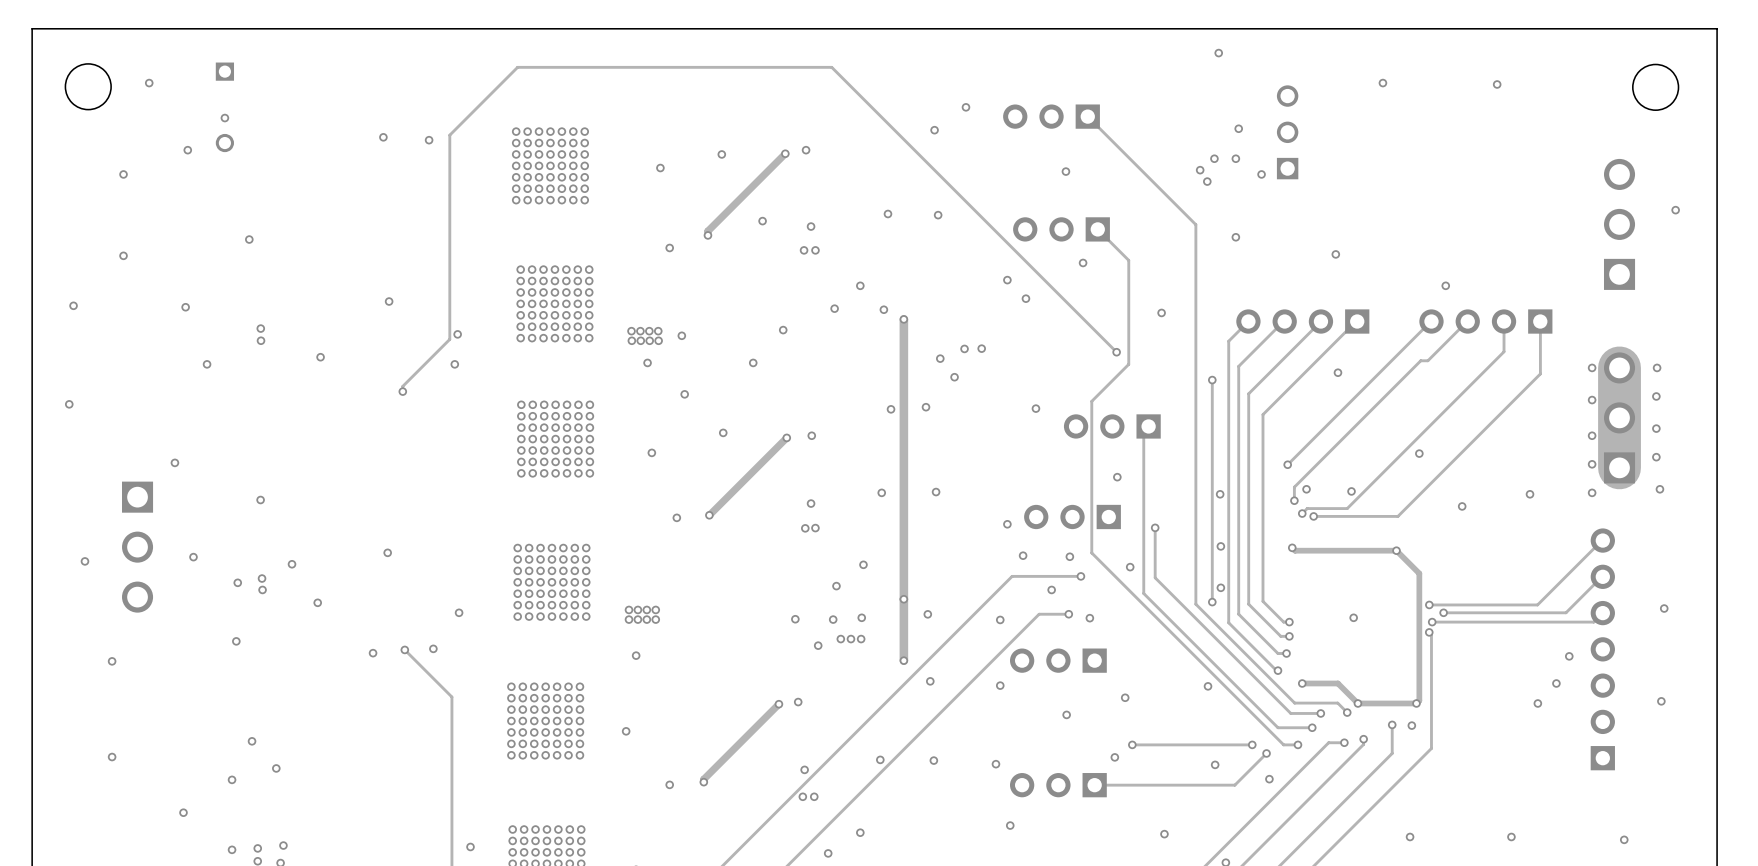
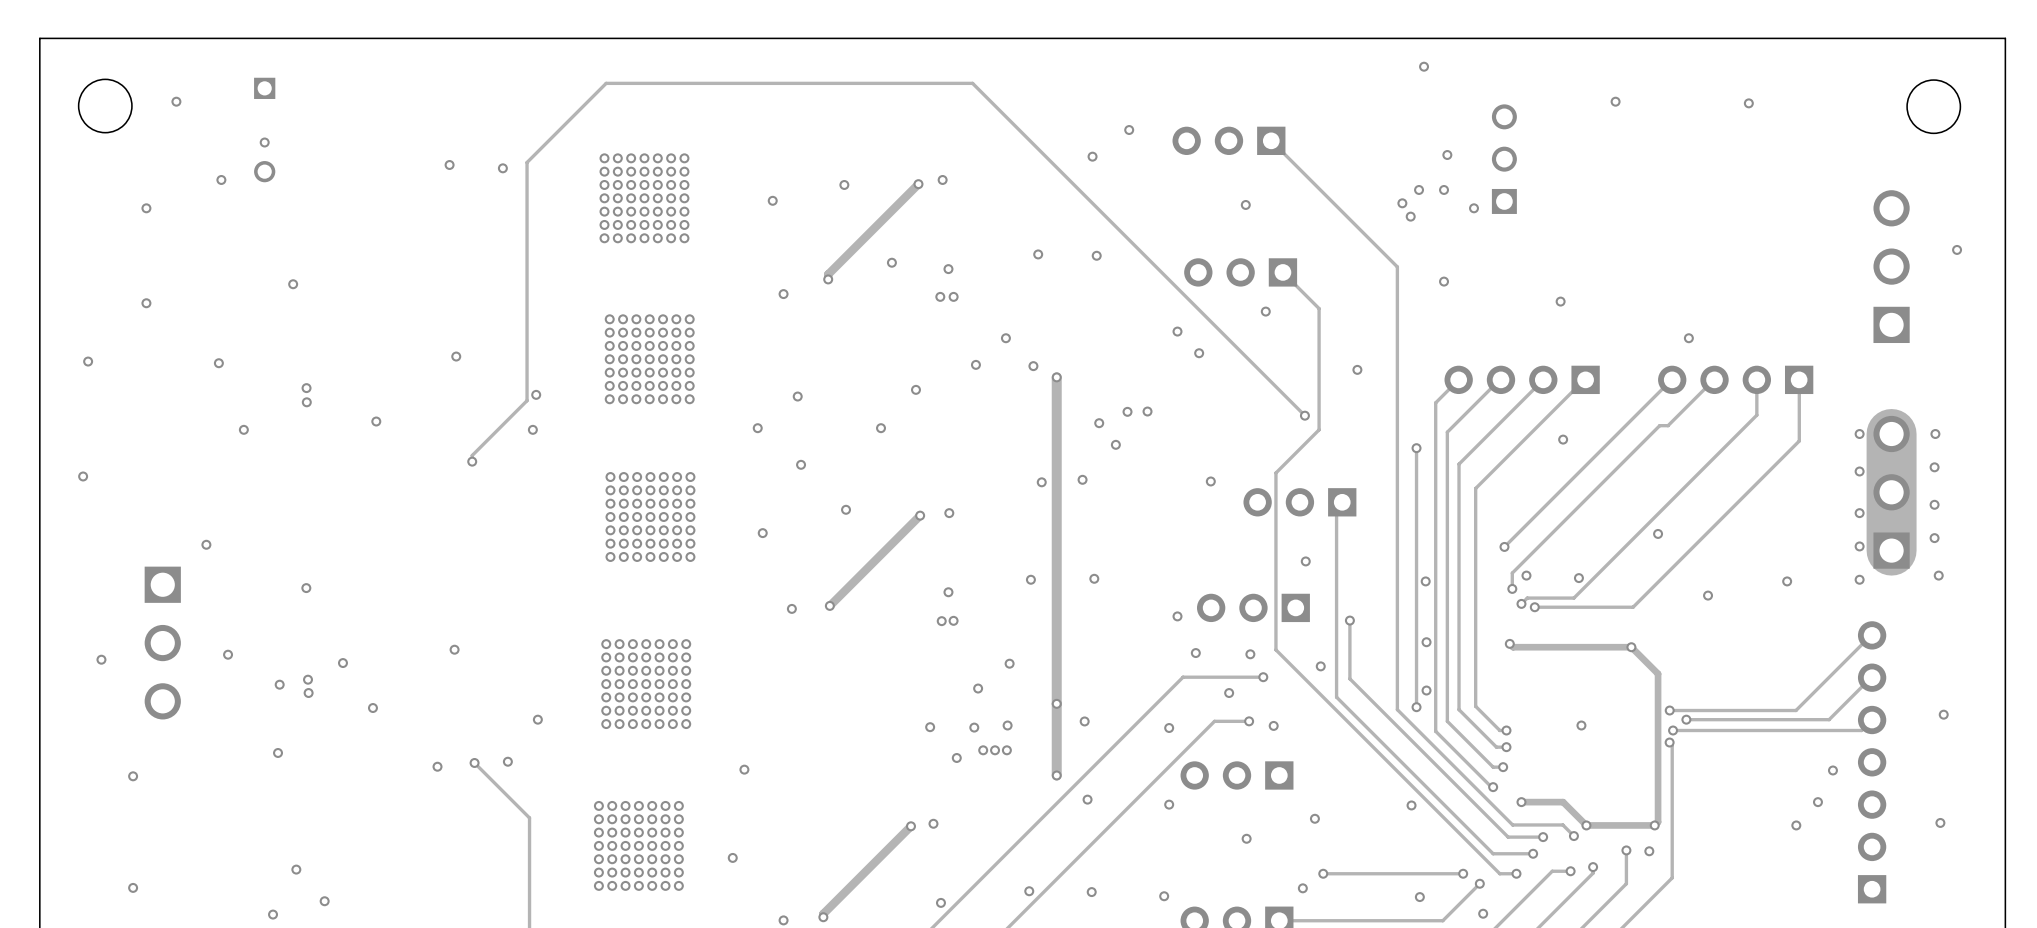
via: (631, 331) -> none
via: (640, 331) -> none
via: (649, 331) -> none
via: (658, 331) -> none
via: (631, 340) -> none
via: (640, 340) -> none
via: (649, 340) -> none
via: (658, 340) -> none
via: (629, 609) -> none
via: (637, 609) -> none
via: (646, 609) -> none
via: (655, 609) -> none
via: (629, 619) -> none
via: (637, 619) -> none
via: (646, 619) -> none
via: (655, 619) -> none

